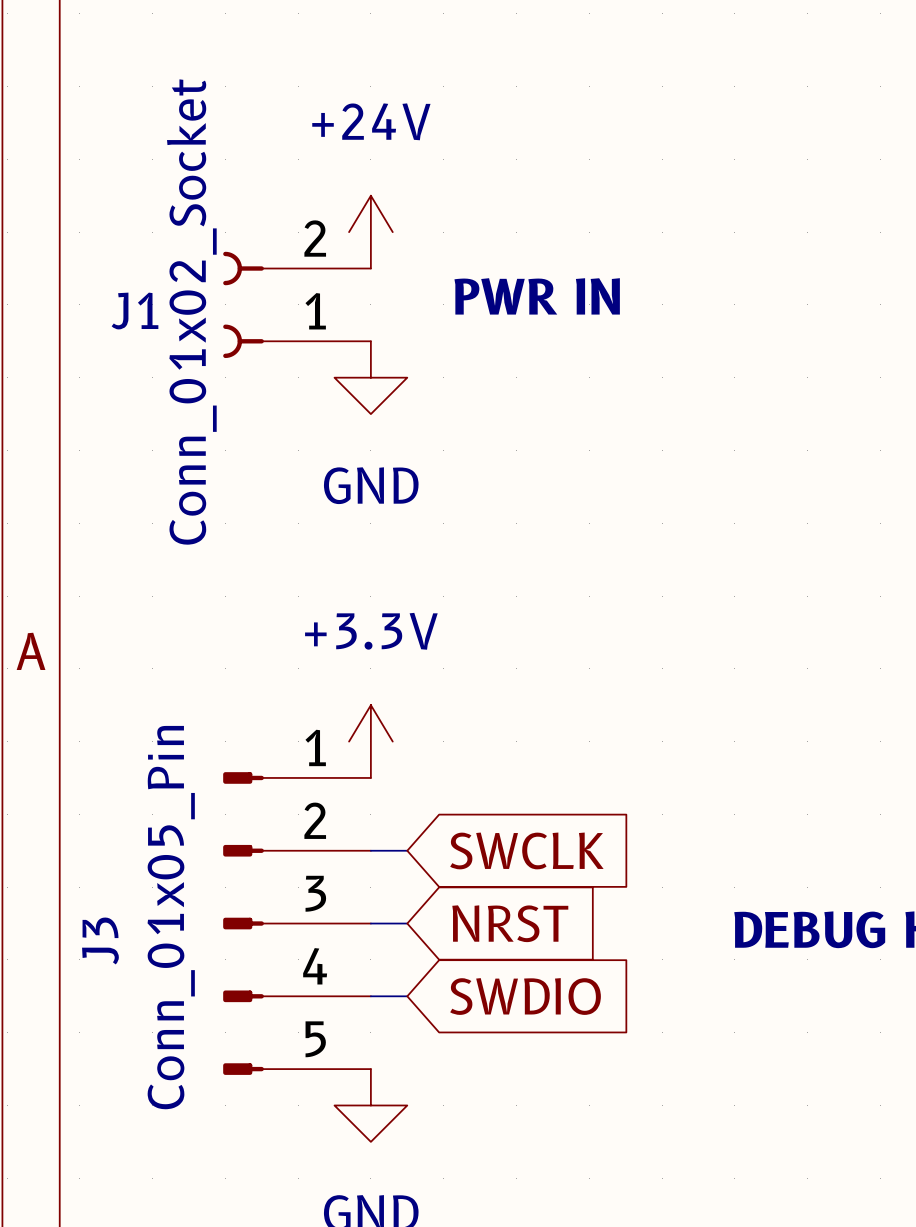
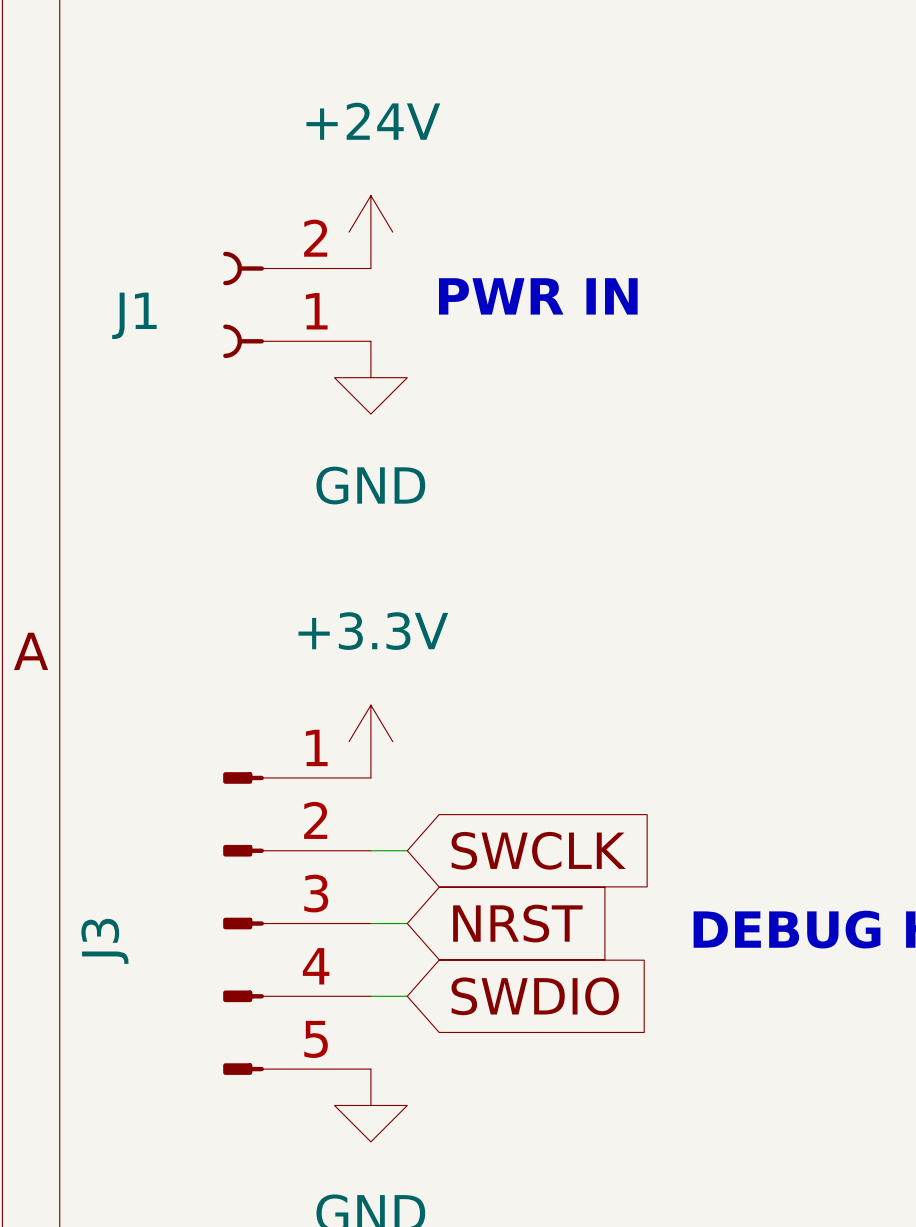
J1 value: Conn_01x02_Socket (191, 312) -> none
J3 value: Conn_01x05_Pin (171, 917) -> none

